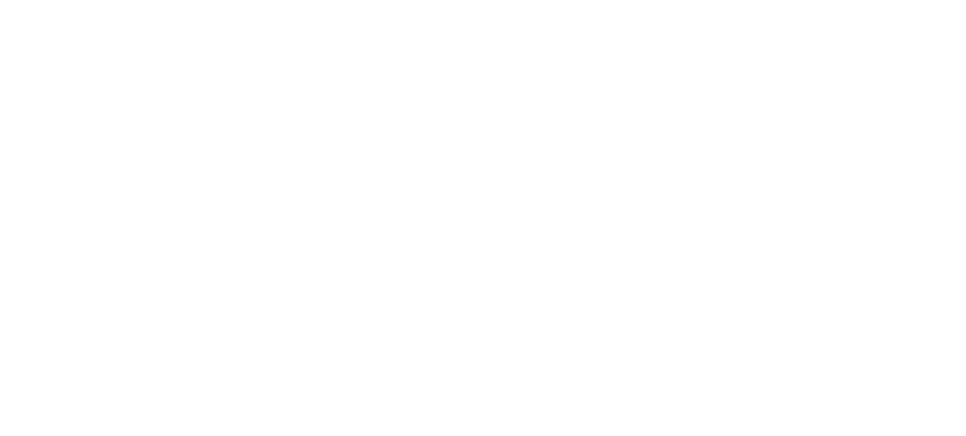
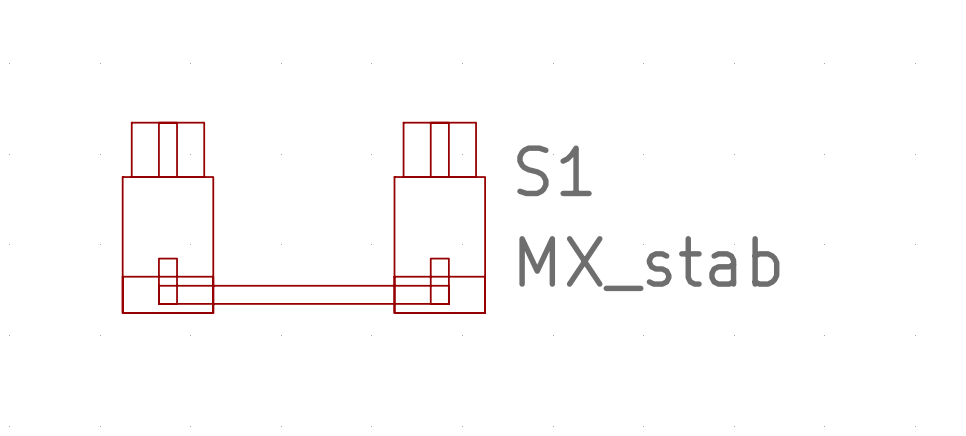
S1: none -> MX_stab (303, 217)

